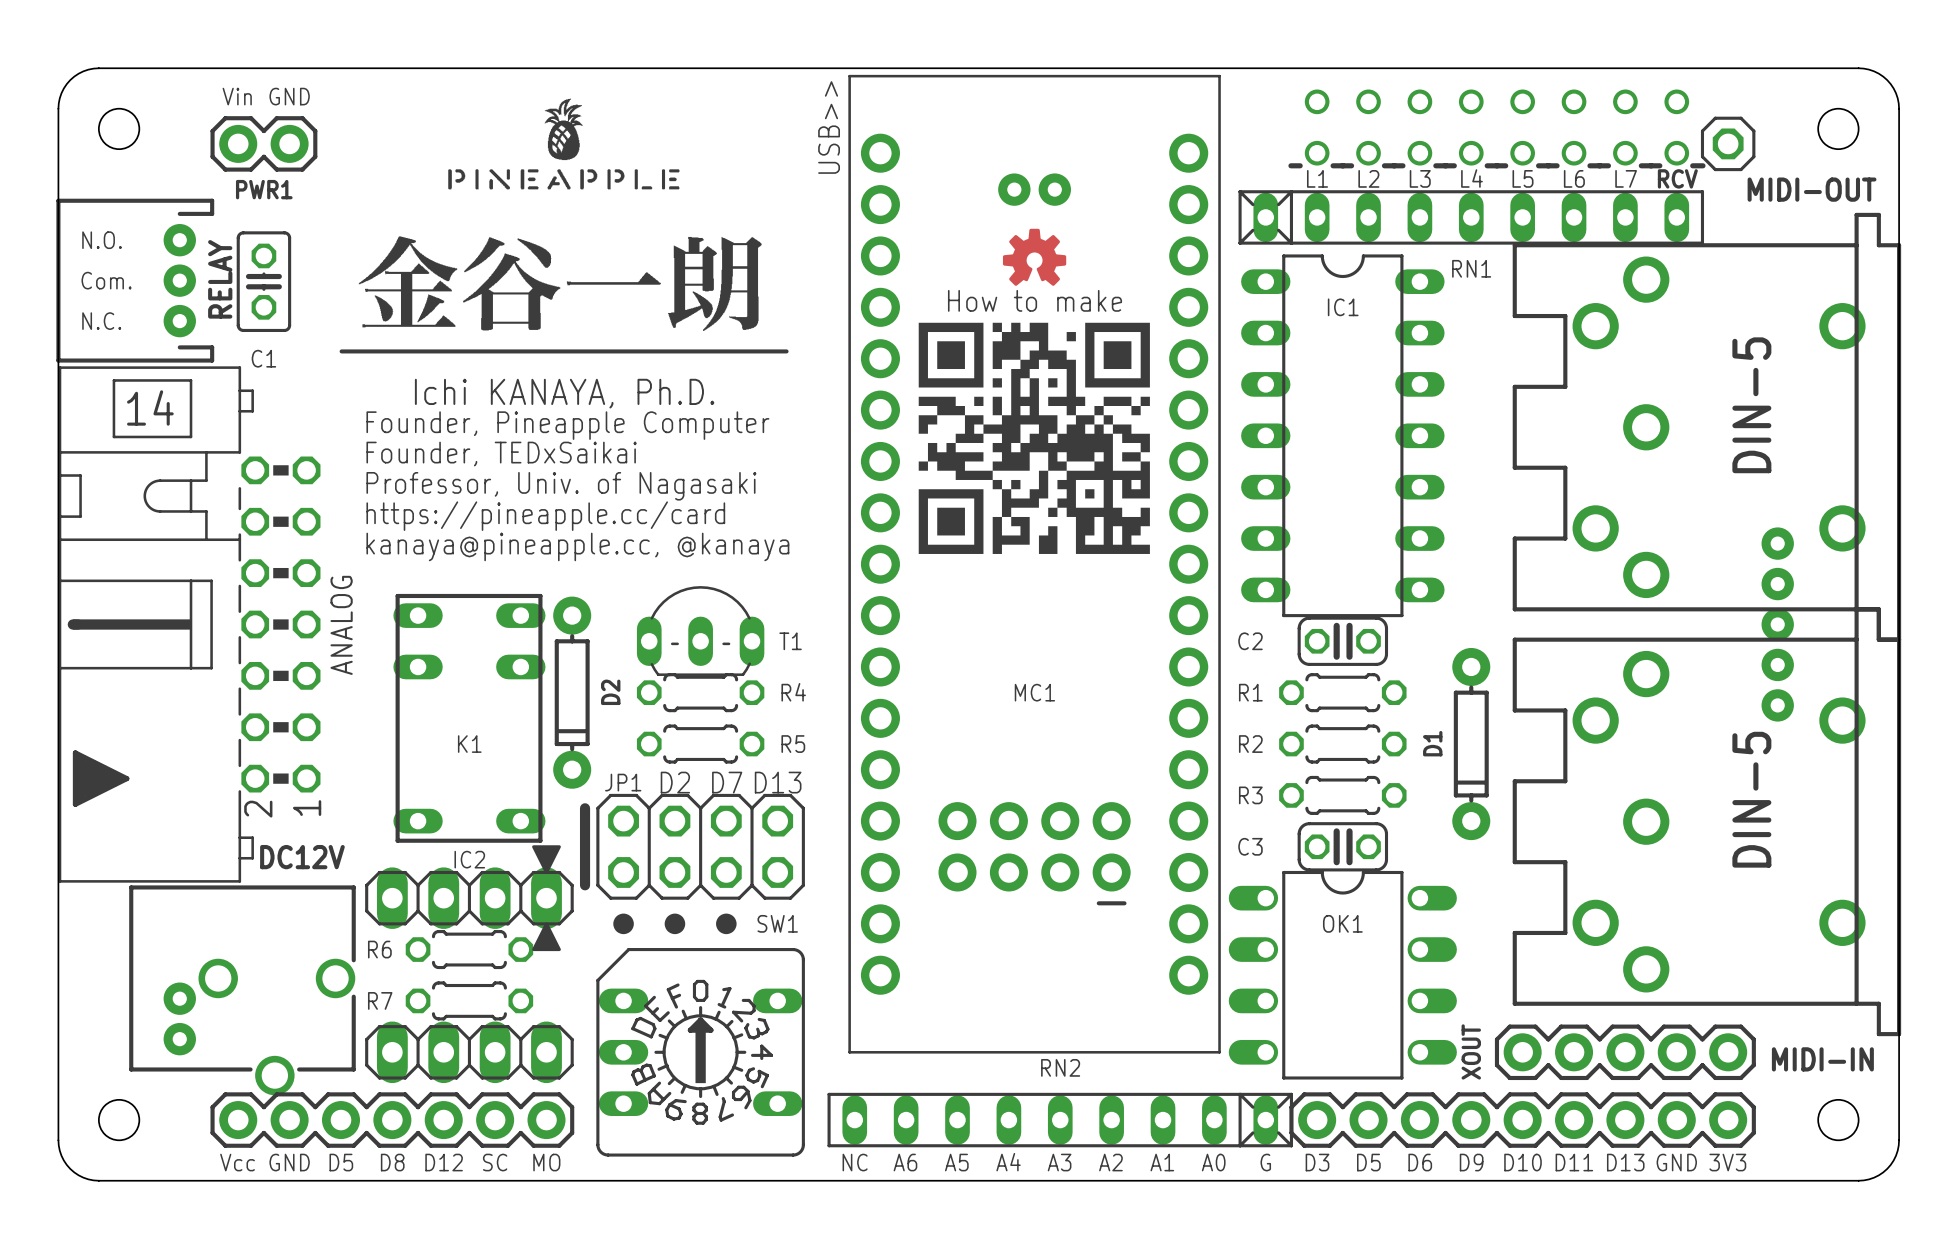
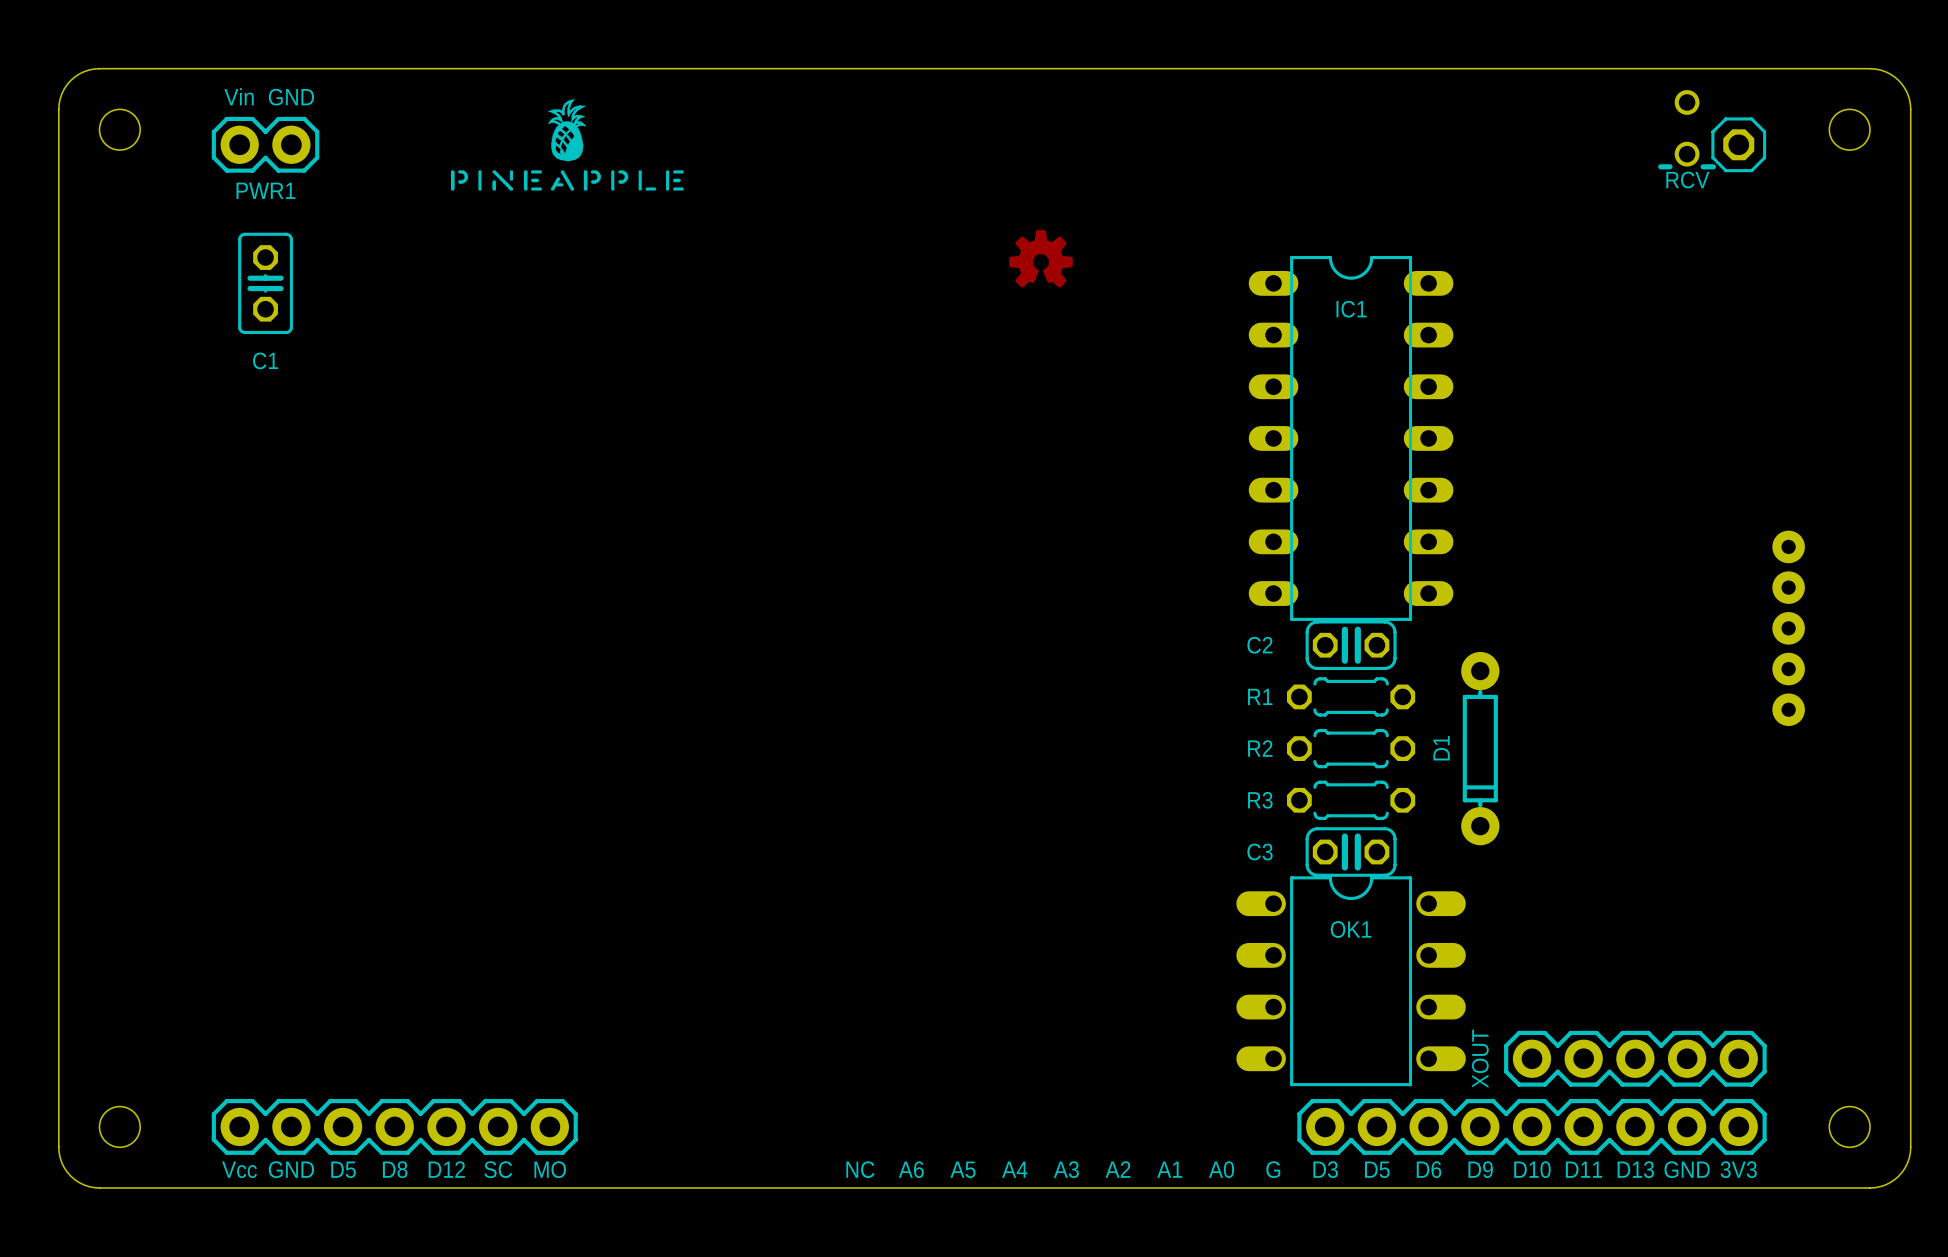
text: USB>> (829, 127) -> none
L1: (1317, 128) -> none
L2: (1368, 128) -> none
L3: (1419, 128) -> none
L4: (1471, 128) -> none
L5: (1522, 128) -> none
L6: (1574, 128) -> none
L7: (1625, 128) -> none
part: (1034, 189) -> none
RN1: (1471, 217) -> none
drawing: [358, 236, 762, 331] -> none
text: N.O. (102, 240) -> none
text: Com. (106, 280) -> none
RELAY: (135, 280) -> none
text: How to make (1035, 300) -> none
text: N.C. (101, 321) -> none
drawing: [918, 322, 1150, 554] -> none
line: (341, 351) (786, 351) -> none
text: Ichi KANAYA, Ph.D. (564, 393) -> none
text: Founder, Pineapple Computer (567, 425) -> none
MIDI-OUT: (1706, 427) -> none
text: Founder, TEDxSaikai (501, 454) -> none
text: Professor, Univ. of Nagasaki (561, 486) -> none
text: https://pineapple.cc/card (545, 516) -> none
text: kanaya@pineapple.cc, @kanaya (577, 546) -> none
part: (1034, 564) -> none
ANALOG: (189, 624) -> none
T1: (700, 631) -> none
D2: (572, 692) -> none
R4: (700, 692) -> none
text: MC1 (1034, 692) -> none
K1: (469, 718) -> none
R5: (700, 744) -> none
text: D2 (675, 782) -> none
text: D7 (727, 782) -> none
text: D13 (778, 782) -> none
line: (585, 808) (585, 885) -> none
MIDI-IN: (1706, 821) -> none
drawing: [532, 845, 561, 875] -> none
JP1: (700, 846) -> none
part: (1034, 853) -> none
text: IC2 (469, 859) -> none
part: (469, 898) -> none
drawing: [613, 913, 634, 935] -> none
drawing: [664, 913, 686, 935] -> none
drawing: [716, 913, 737, 935] -> none
drawing: [532, 922, 561, 952] -> none
R6: (469, 949) -> none
DC12V: (242, 990) -> none
R7: (469, 1000) -> none
part: (179, 1018) -> none
part: (469, 1052) -> none
SW1: (700, 1052) -> none
RN2: (1060, 1120) -> none

